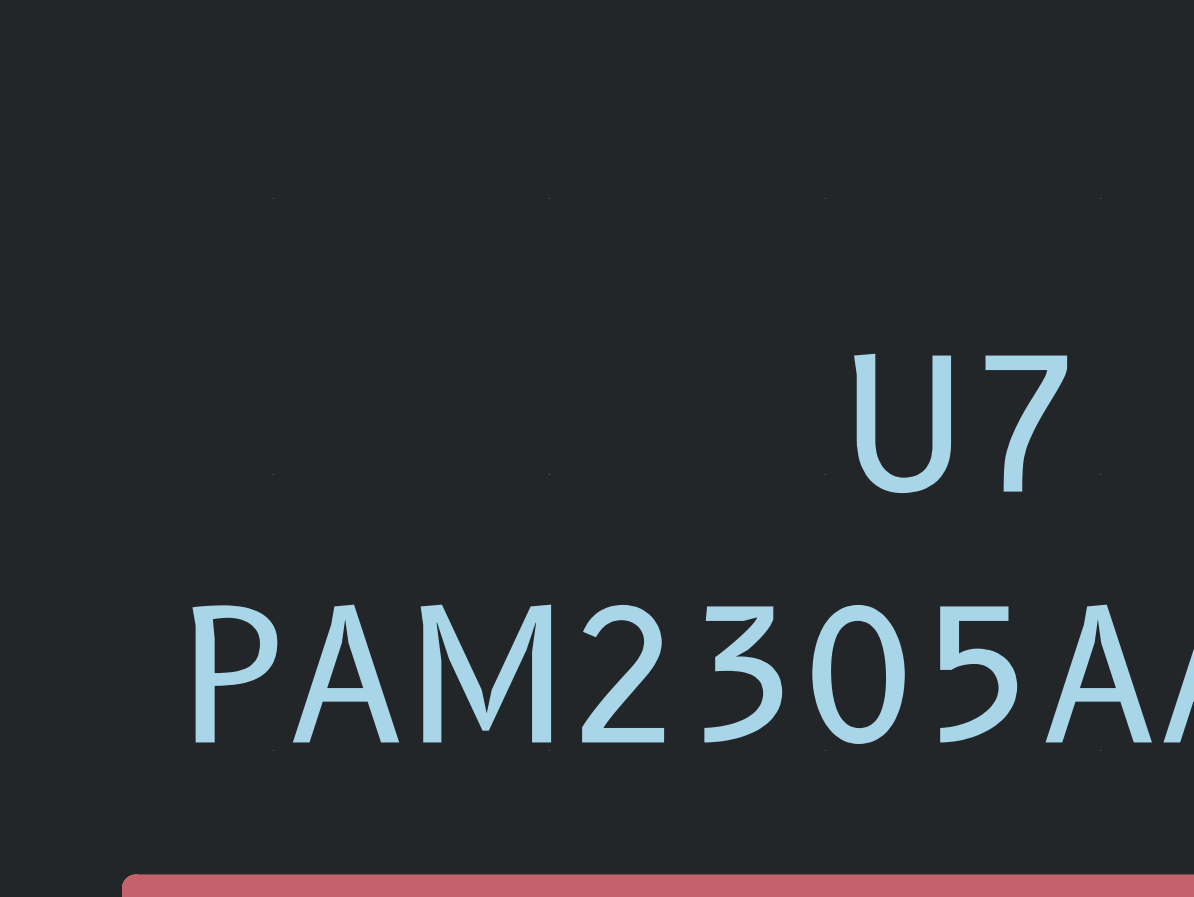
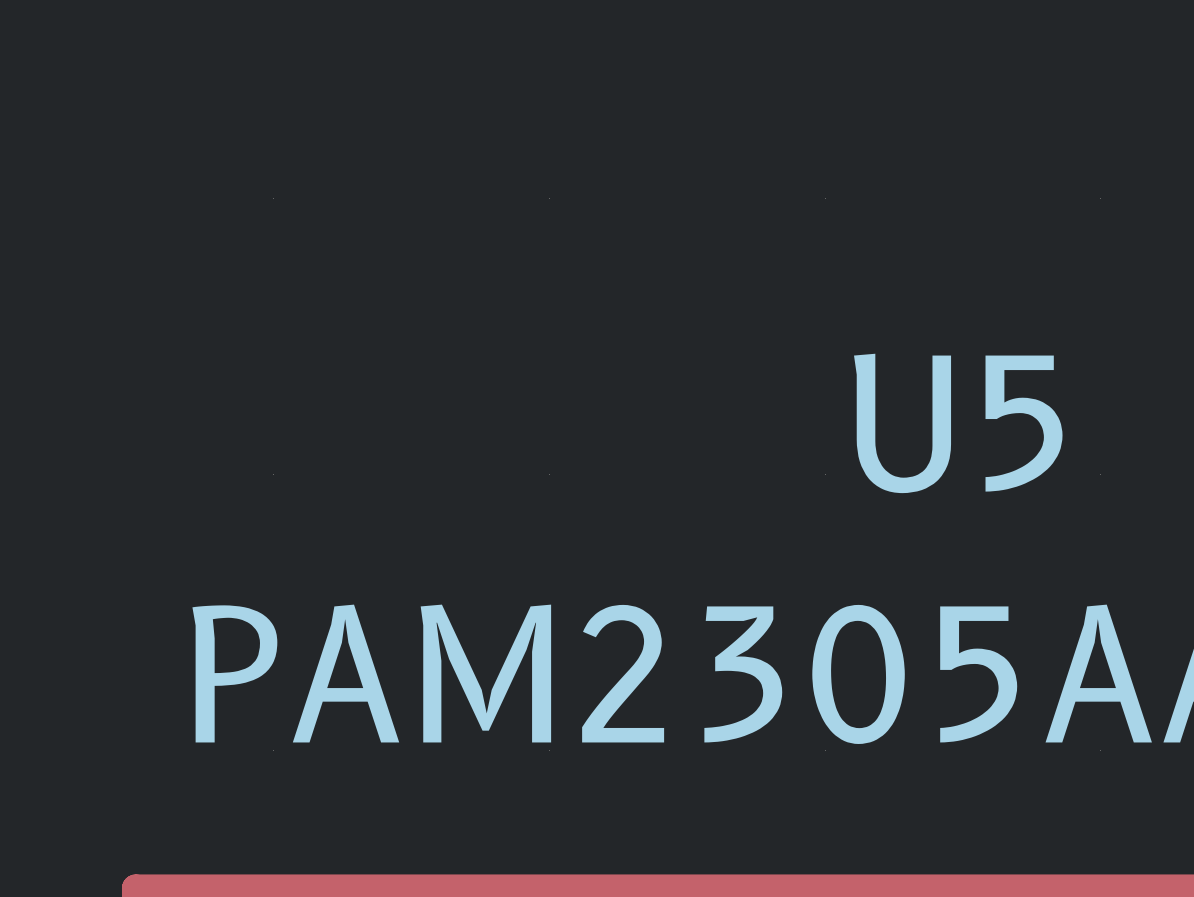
U7 name: U7 (960, 423) -> U5 (958, 423)

